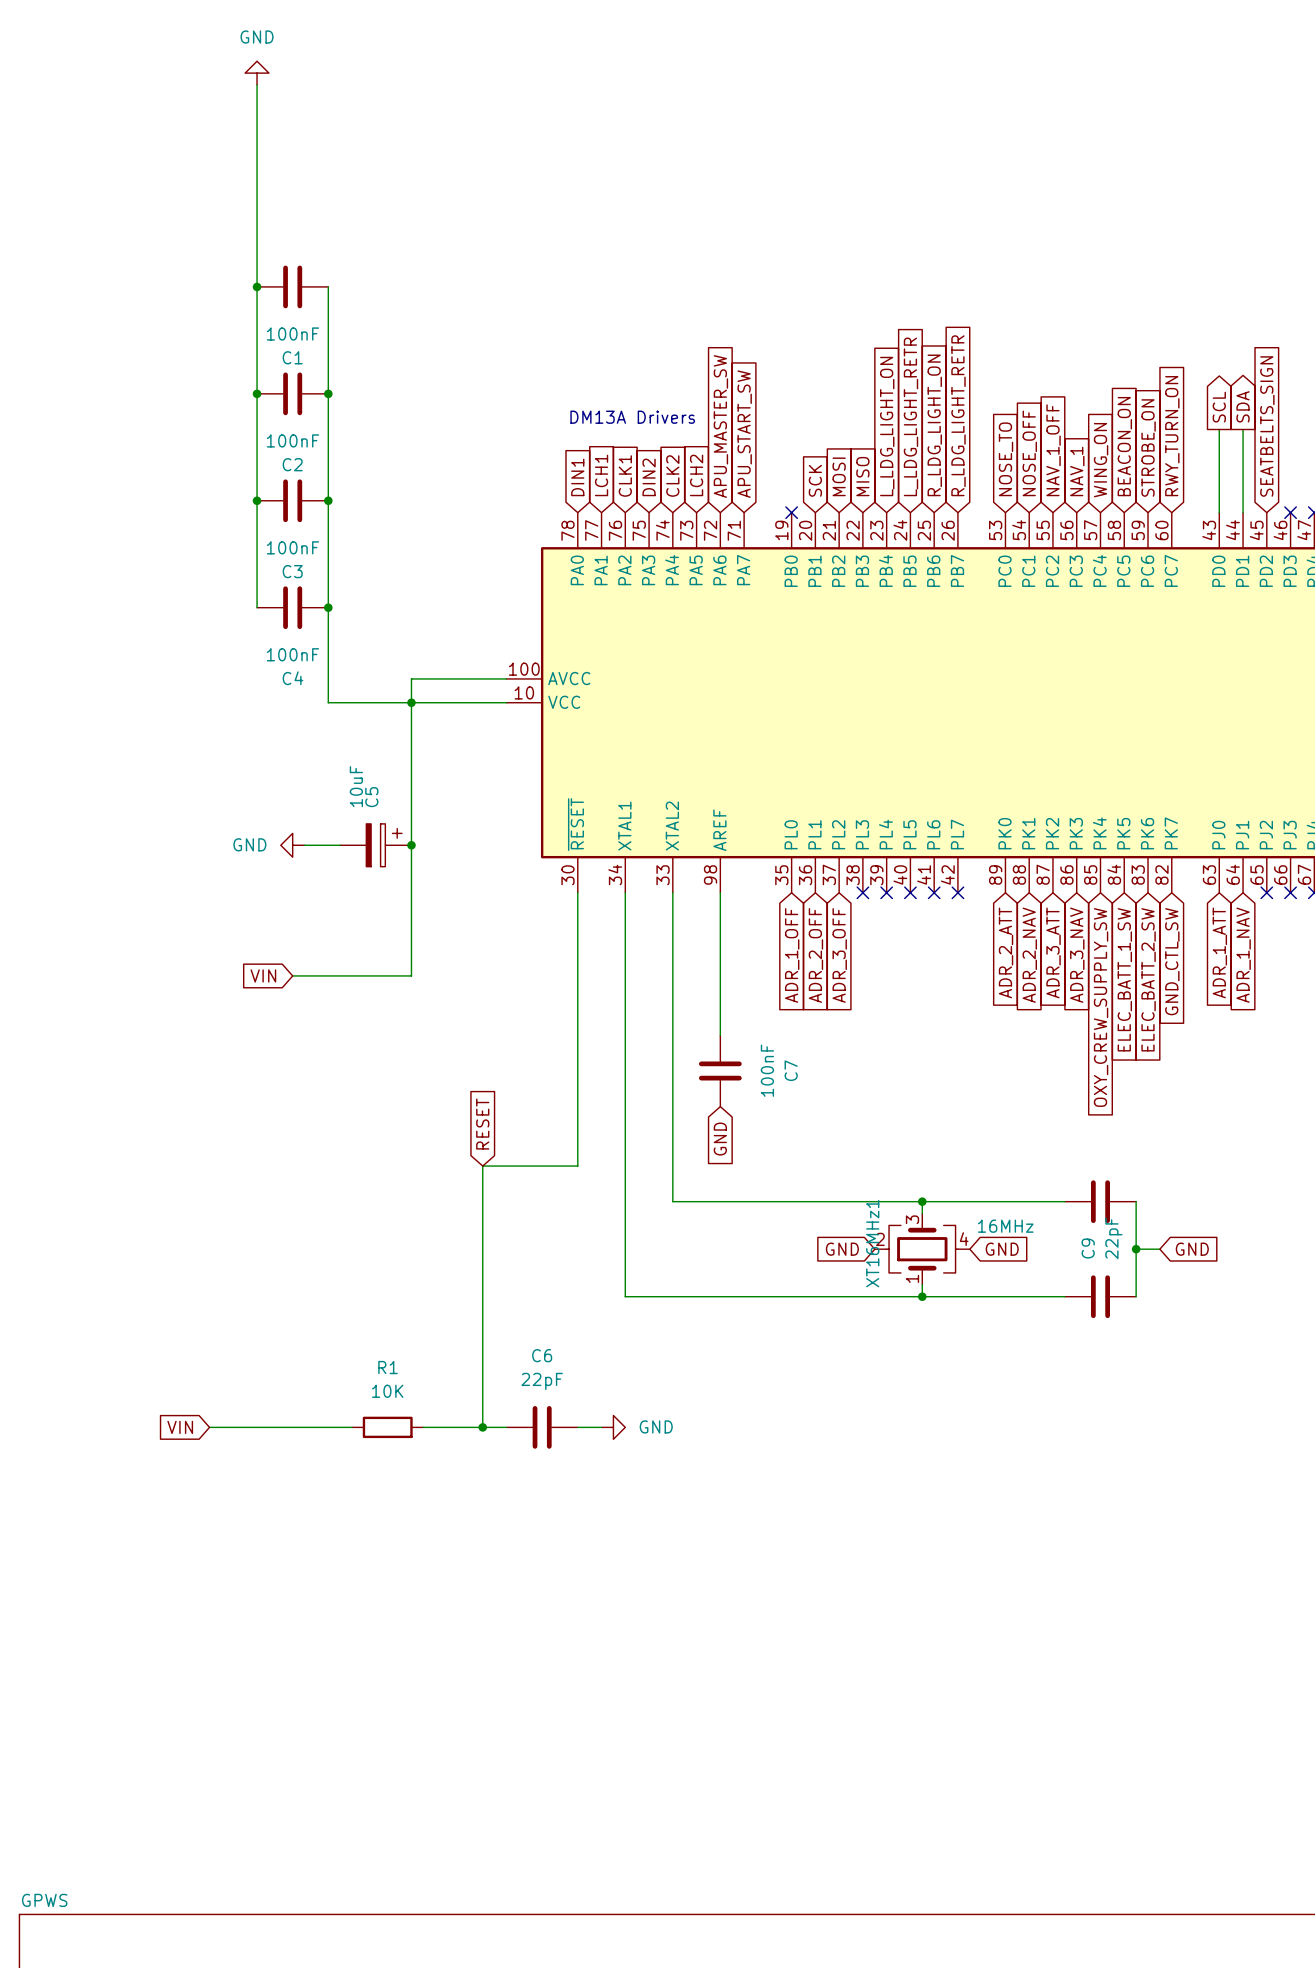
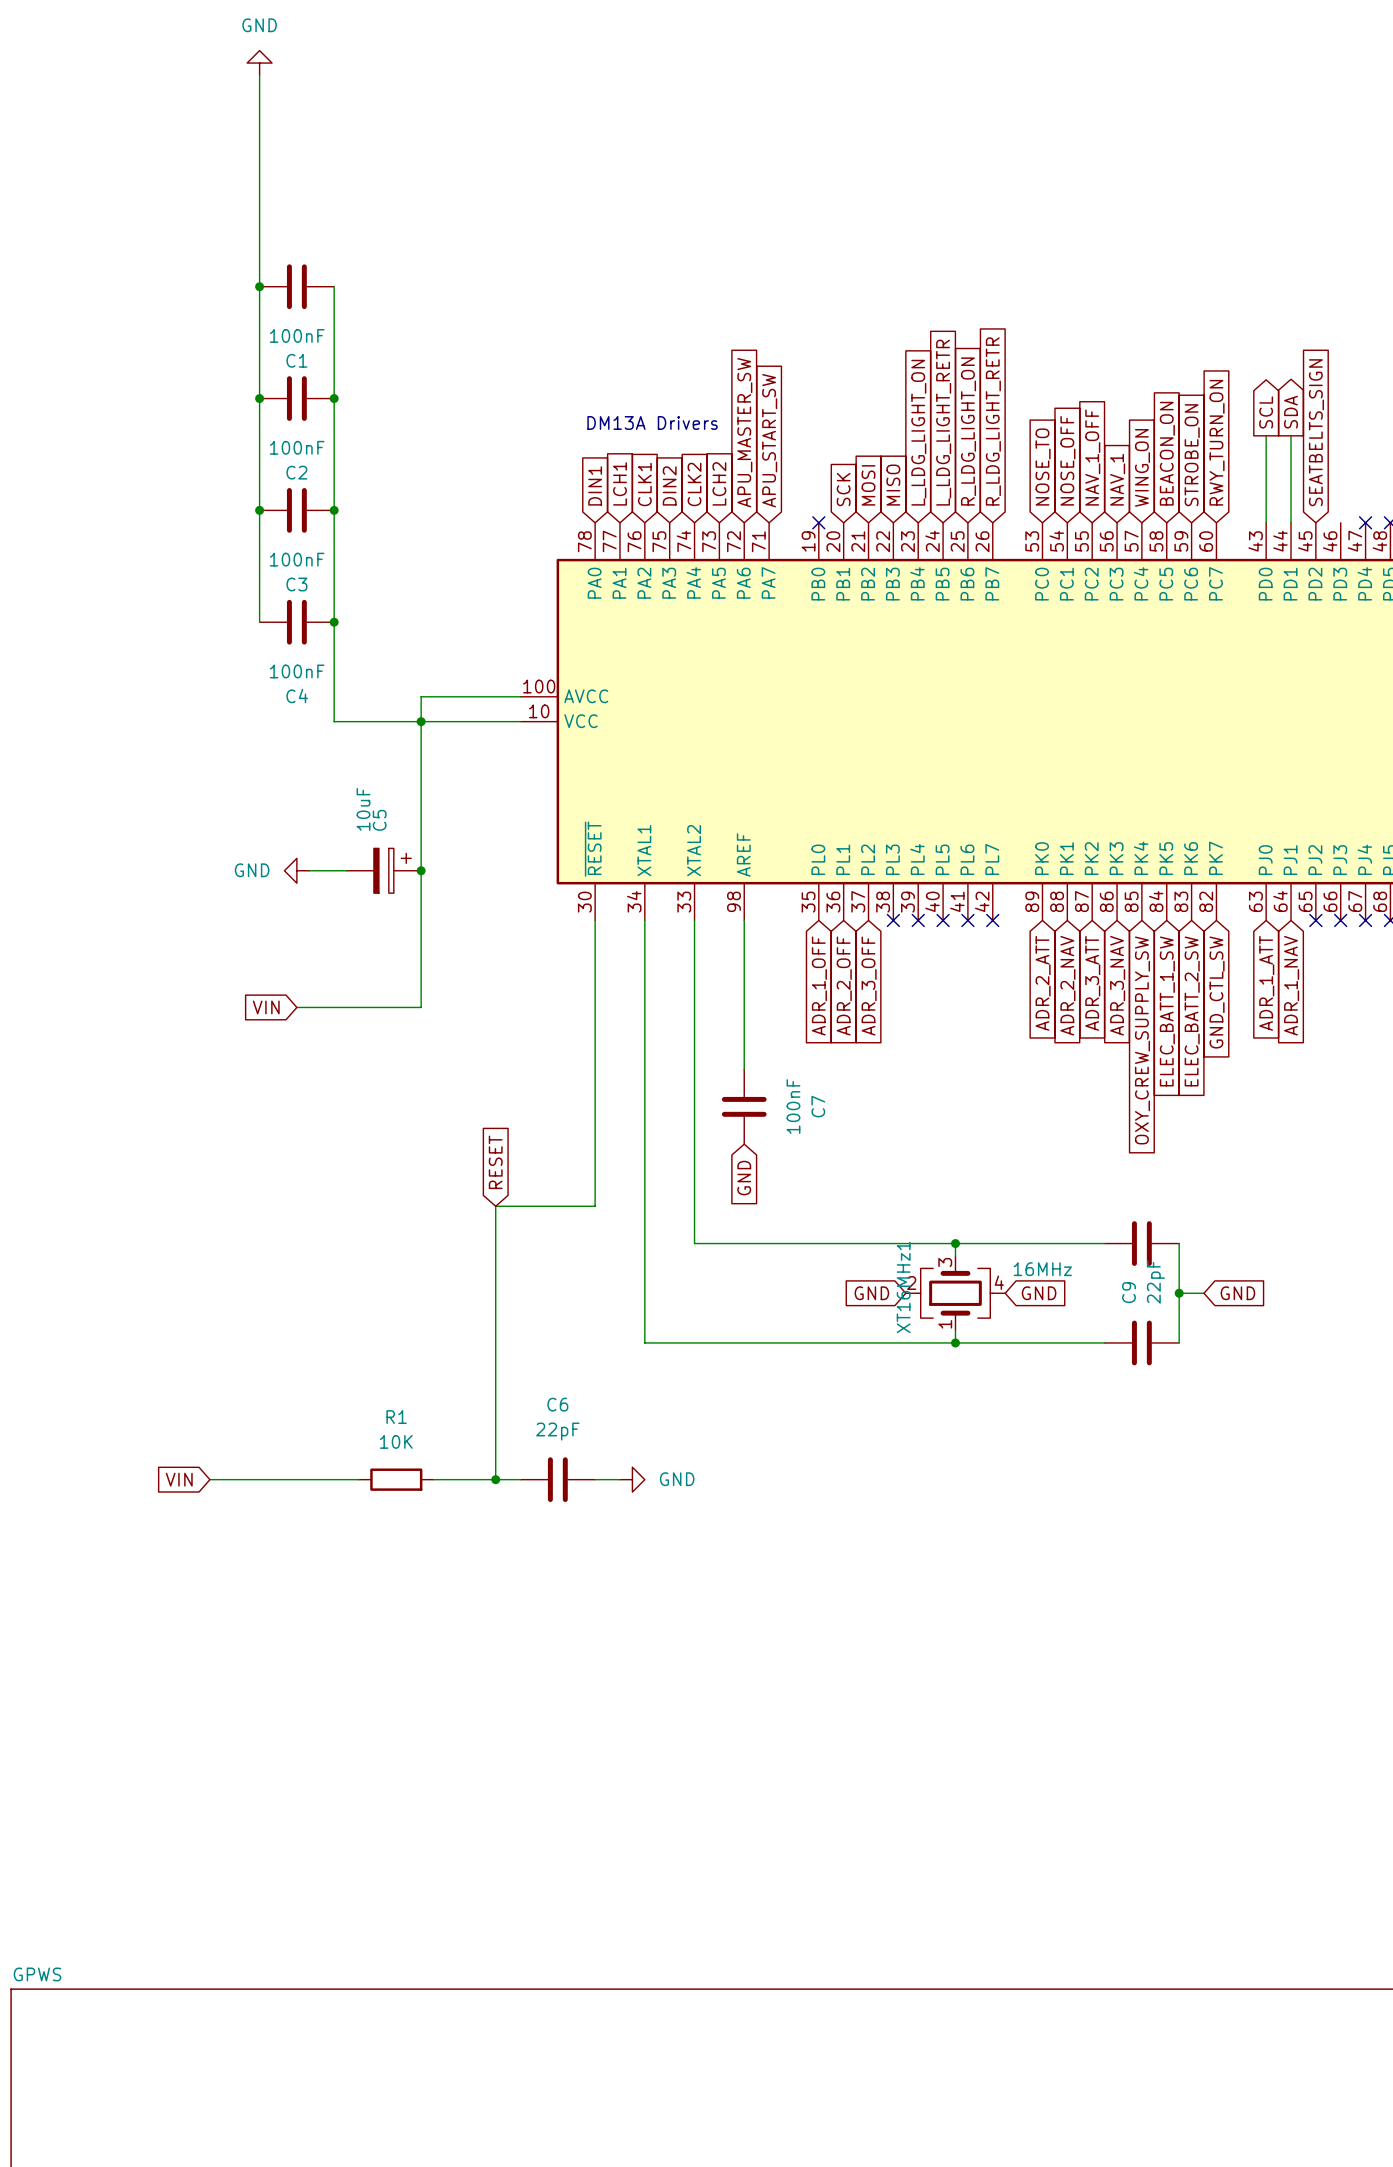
no-connect mark: (1290, 512) -> none

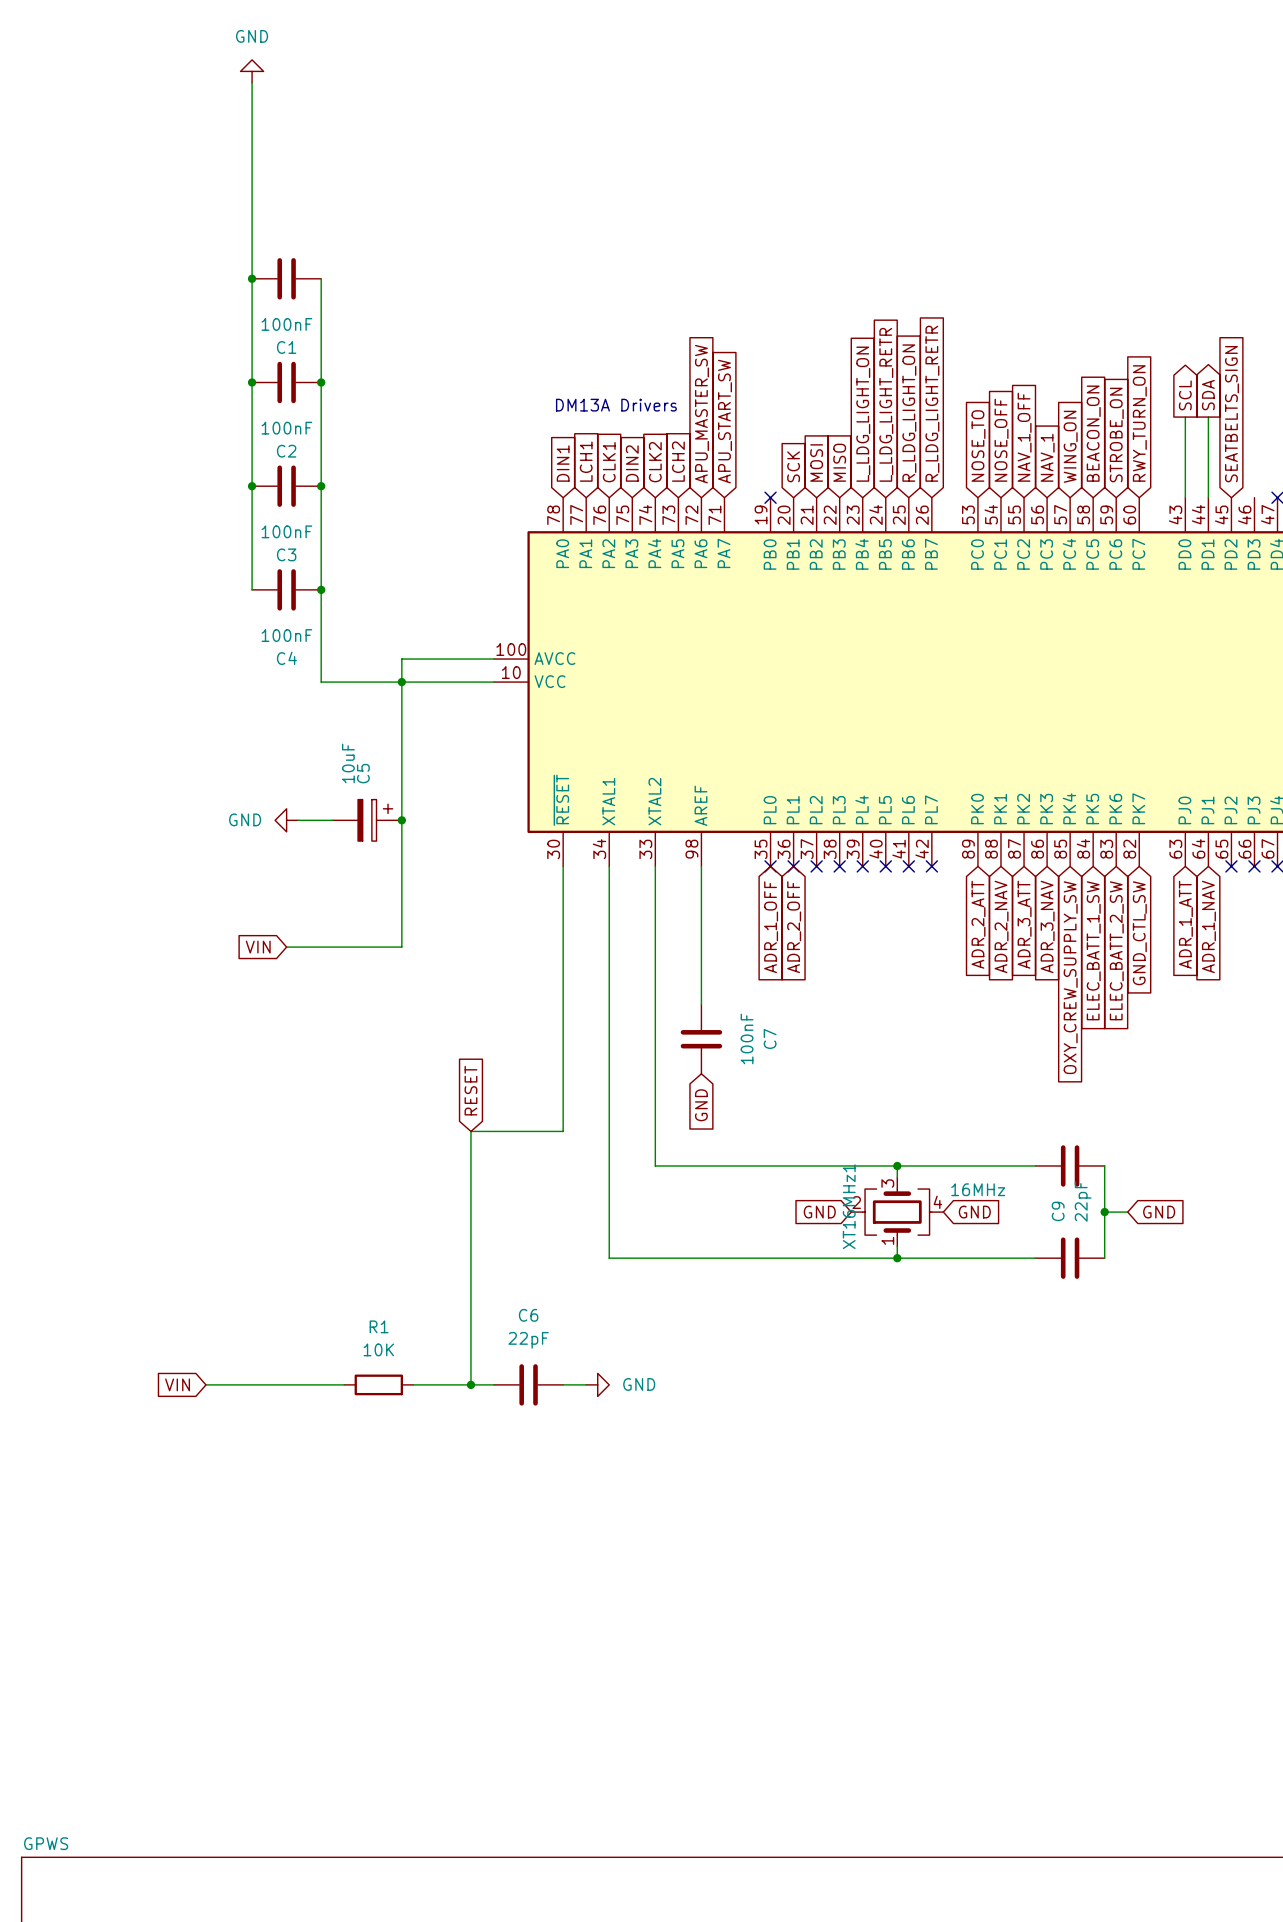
no-connect mark: none -> (770, 866)
no-connect mark: none -> (793, 866)
no-connect mark: none -> (816, 866)
global label: ADR_3_OFF (869, 986) -> none

